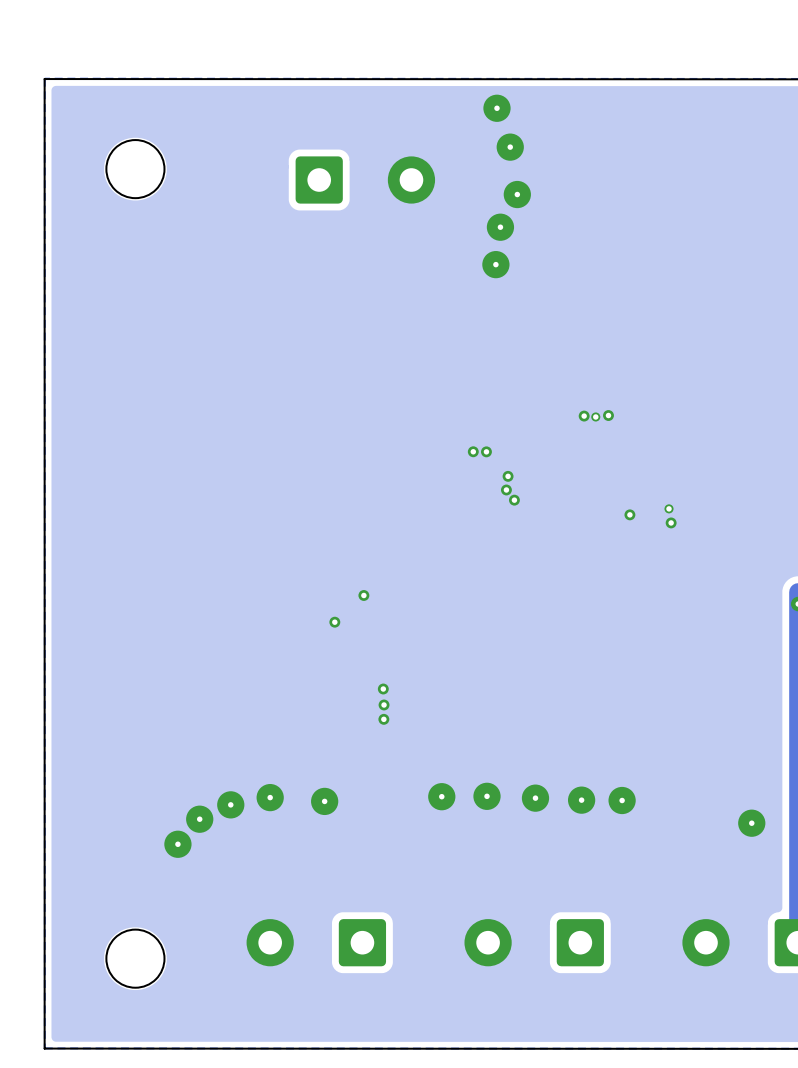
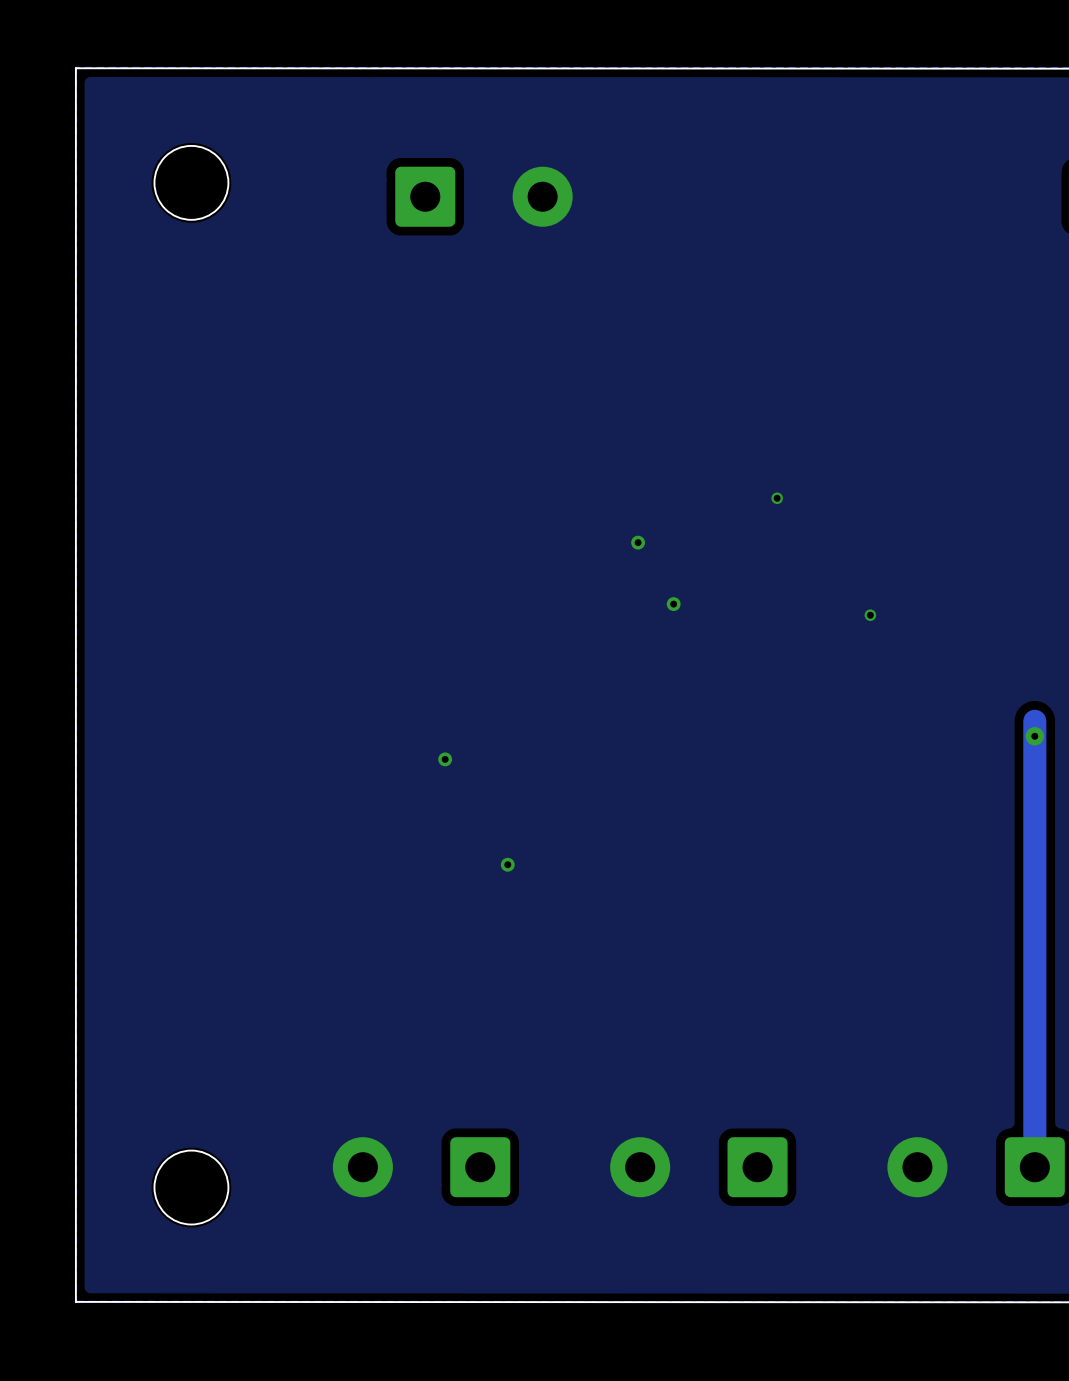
via: (496, 108) -> none
via: (510, 147) -> none
via: (517, 194) -> none
via: (500, 227) -> none
via: (495, 264) -> none
via: (608, 415) -> none
via: (584, 416) -> none
via: (473, 451) -> none
via: (508, 476) -> none
via: (506, 489) -> none
via: (629, 514) -> none
via: (671, 522) -> none
via: (363, 595) -> none
via: (383, 689) -> none
via: (383, 719) -> none
via: (441, 796) -> none
via: (487, 796) -> none
via: (270, 797) -> none
via: (535, 798) -> none
via: (581, 800) -> none
via: (622, 800) -> none
via: (324, 801) -> none
via: (230, 804) -> none
via: (199, 819) -> none
via: (751, 823) -> none
via: (177, 844) -> none

